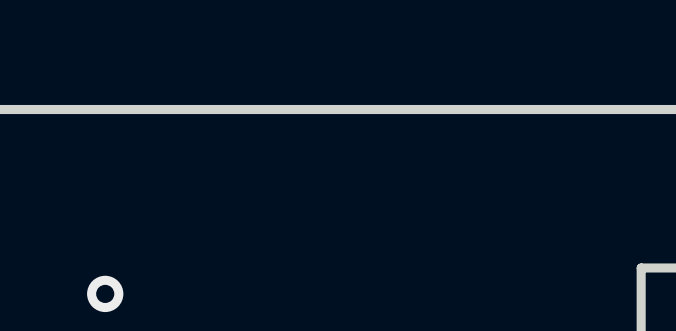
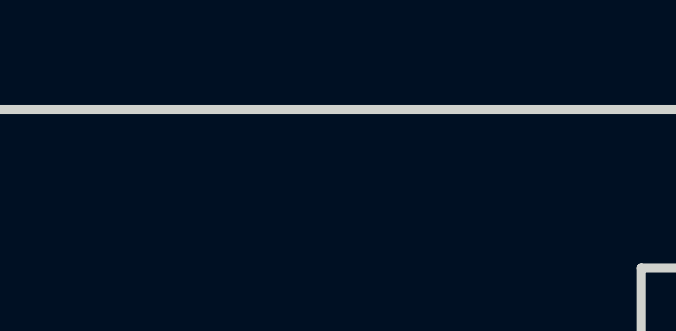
via: (105, 293) -> none

